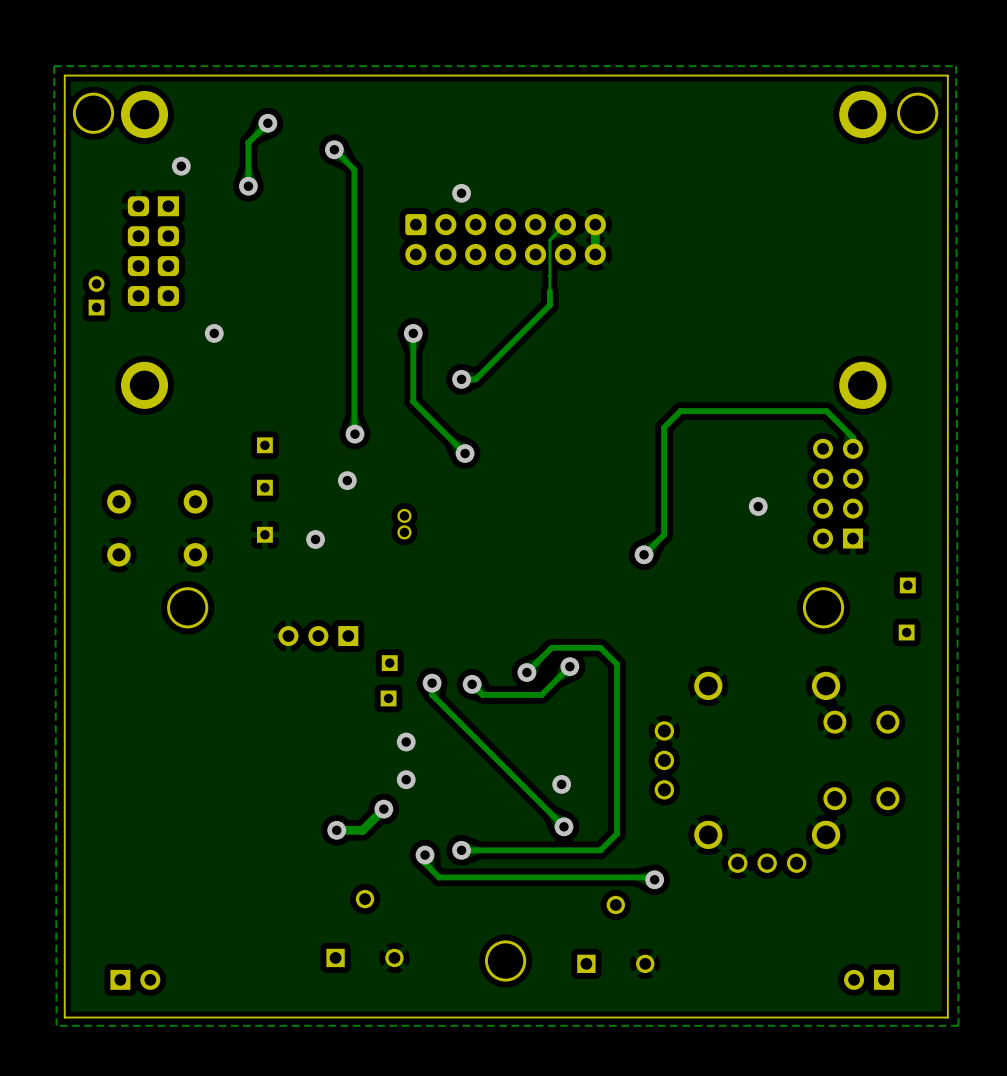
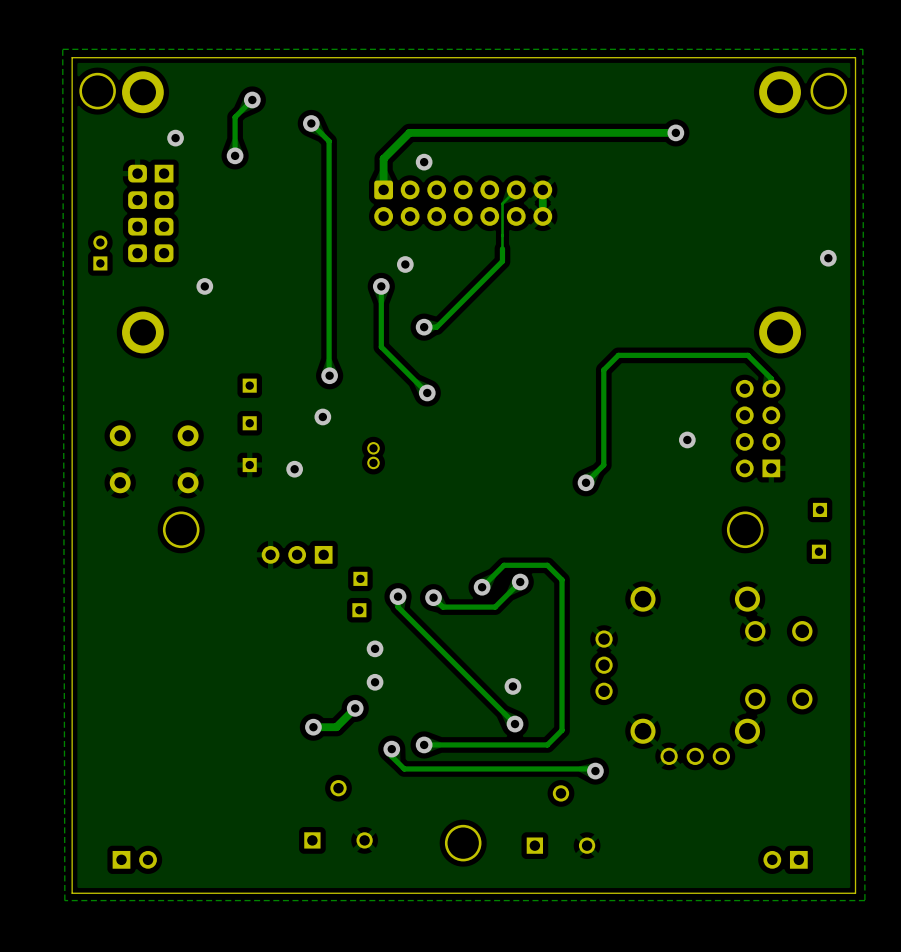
track: none -> (675, 132) (409, 132) (383, 158) (383, 189)
via: none -> (675, 132)
via: none -> (828, 258)
via: none -> (405, 264)

